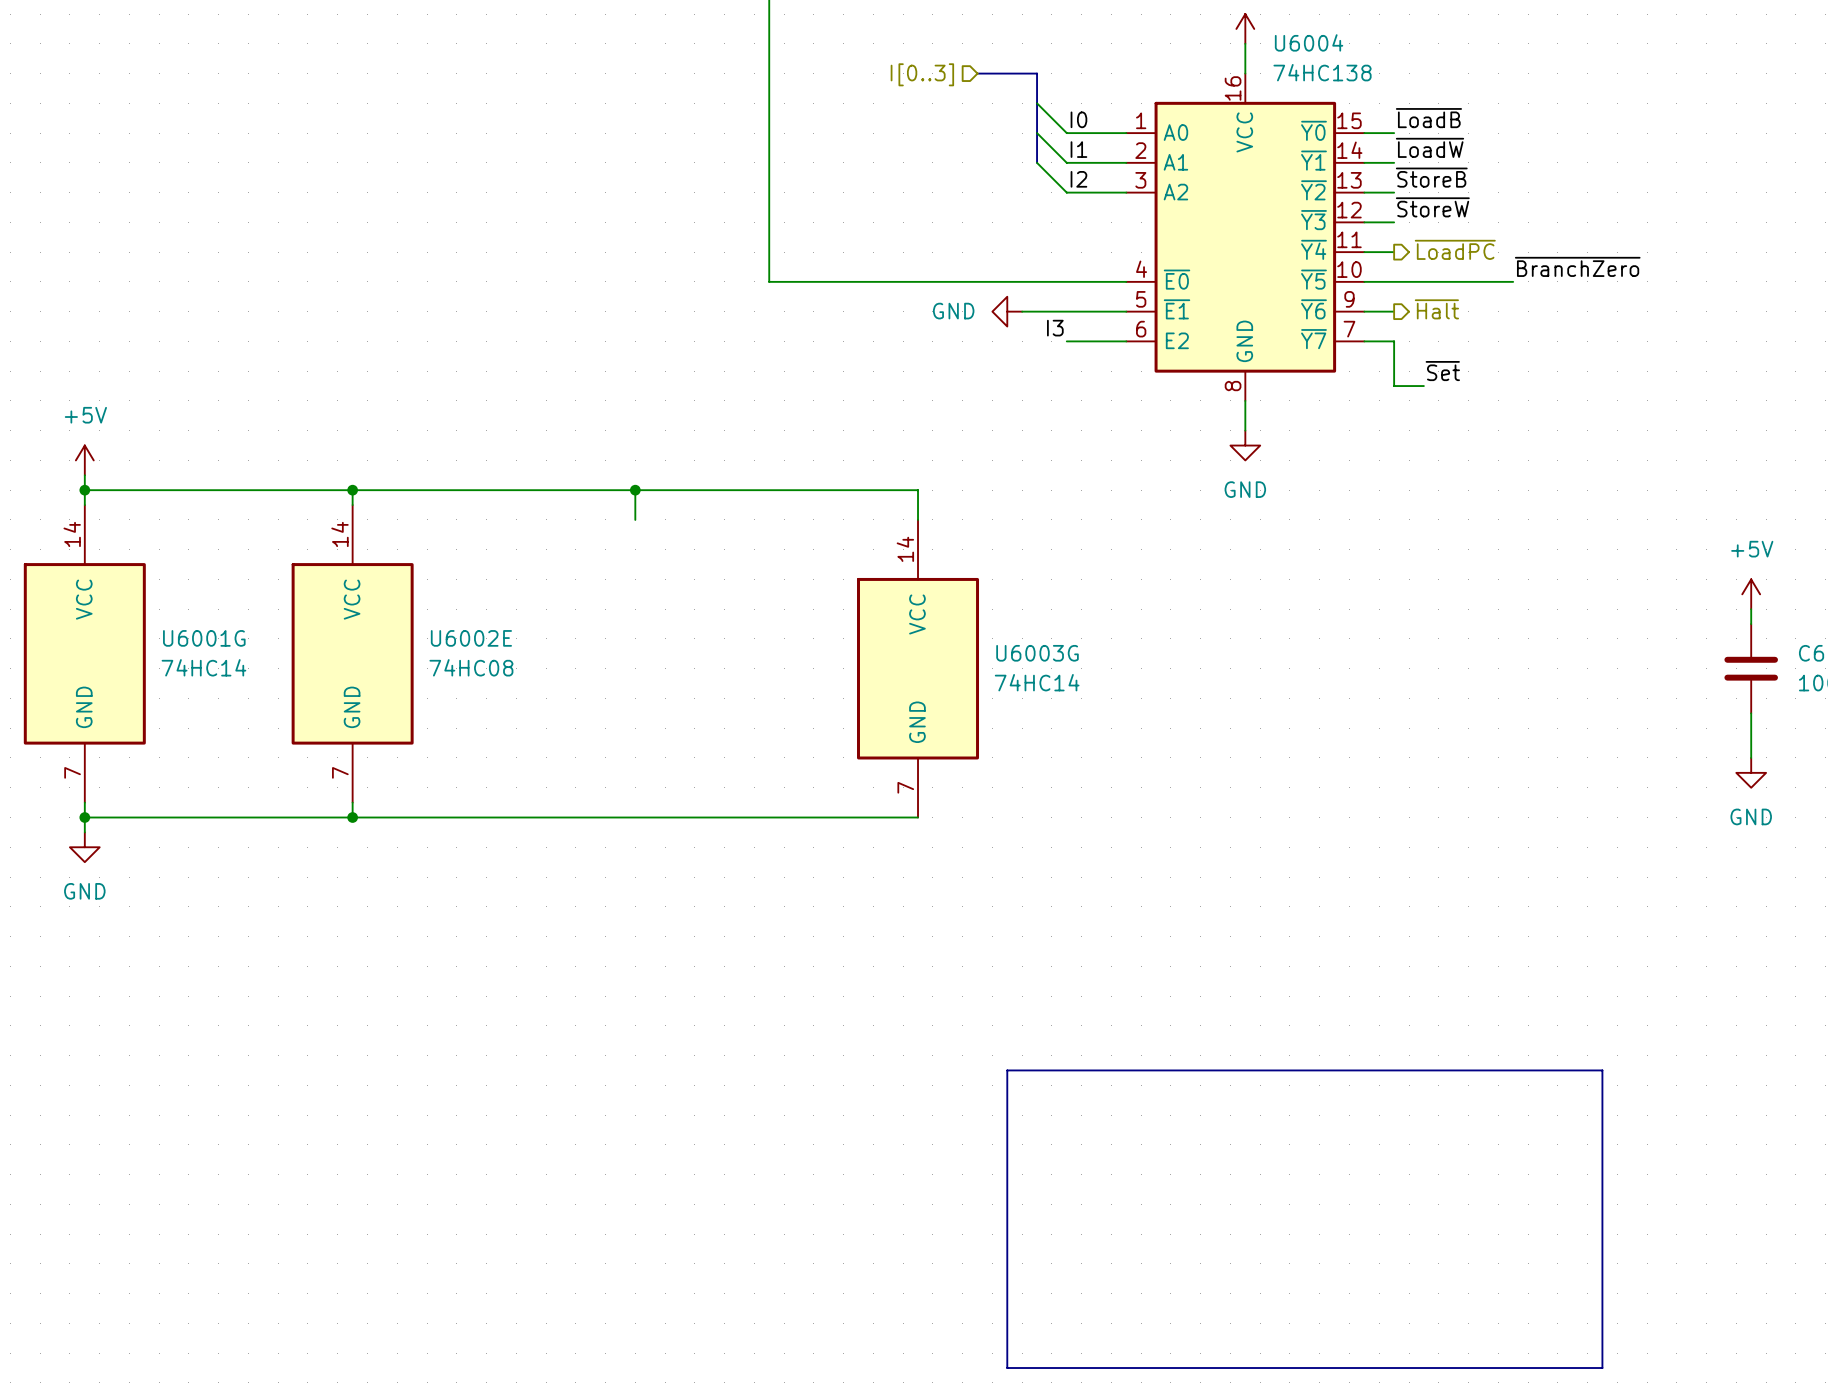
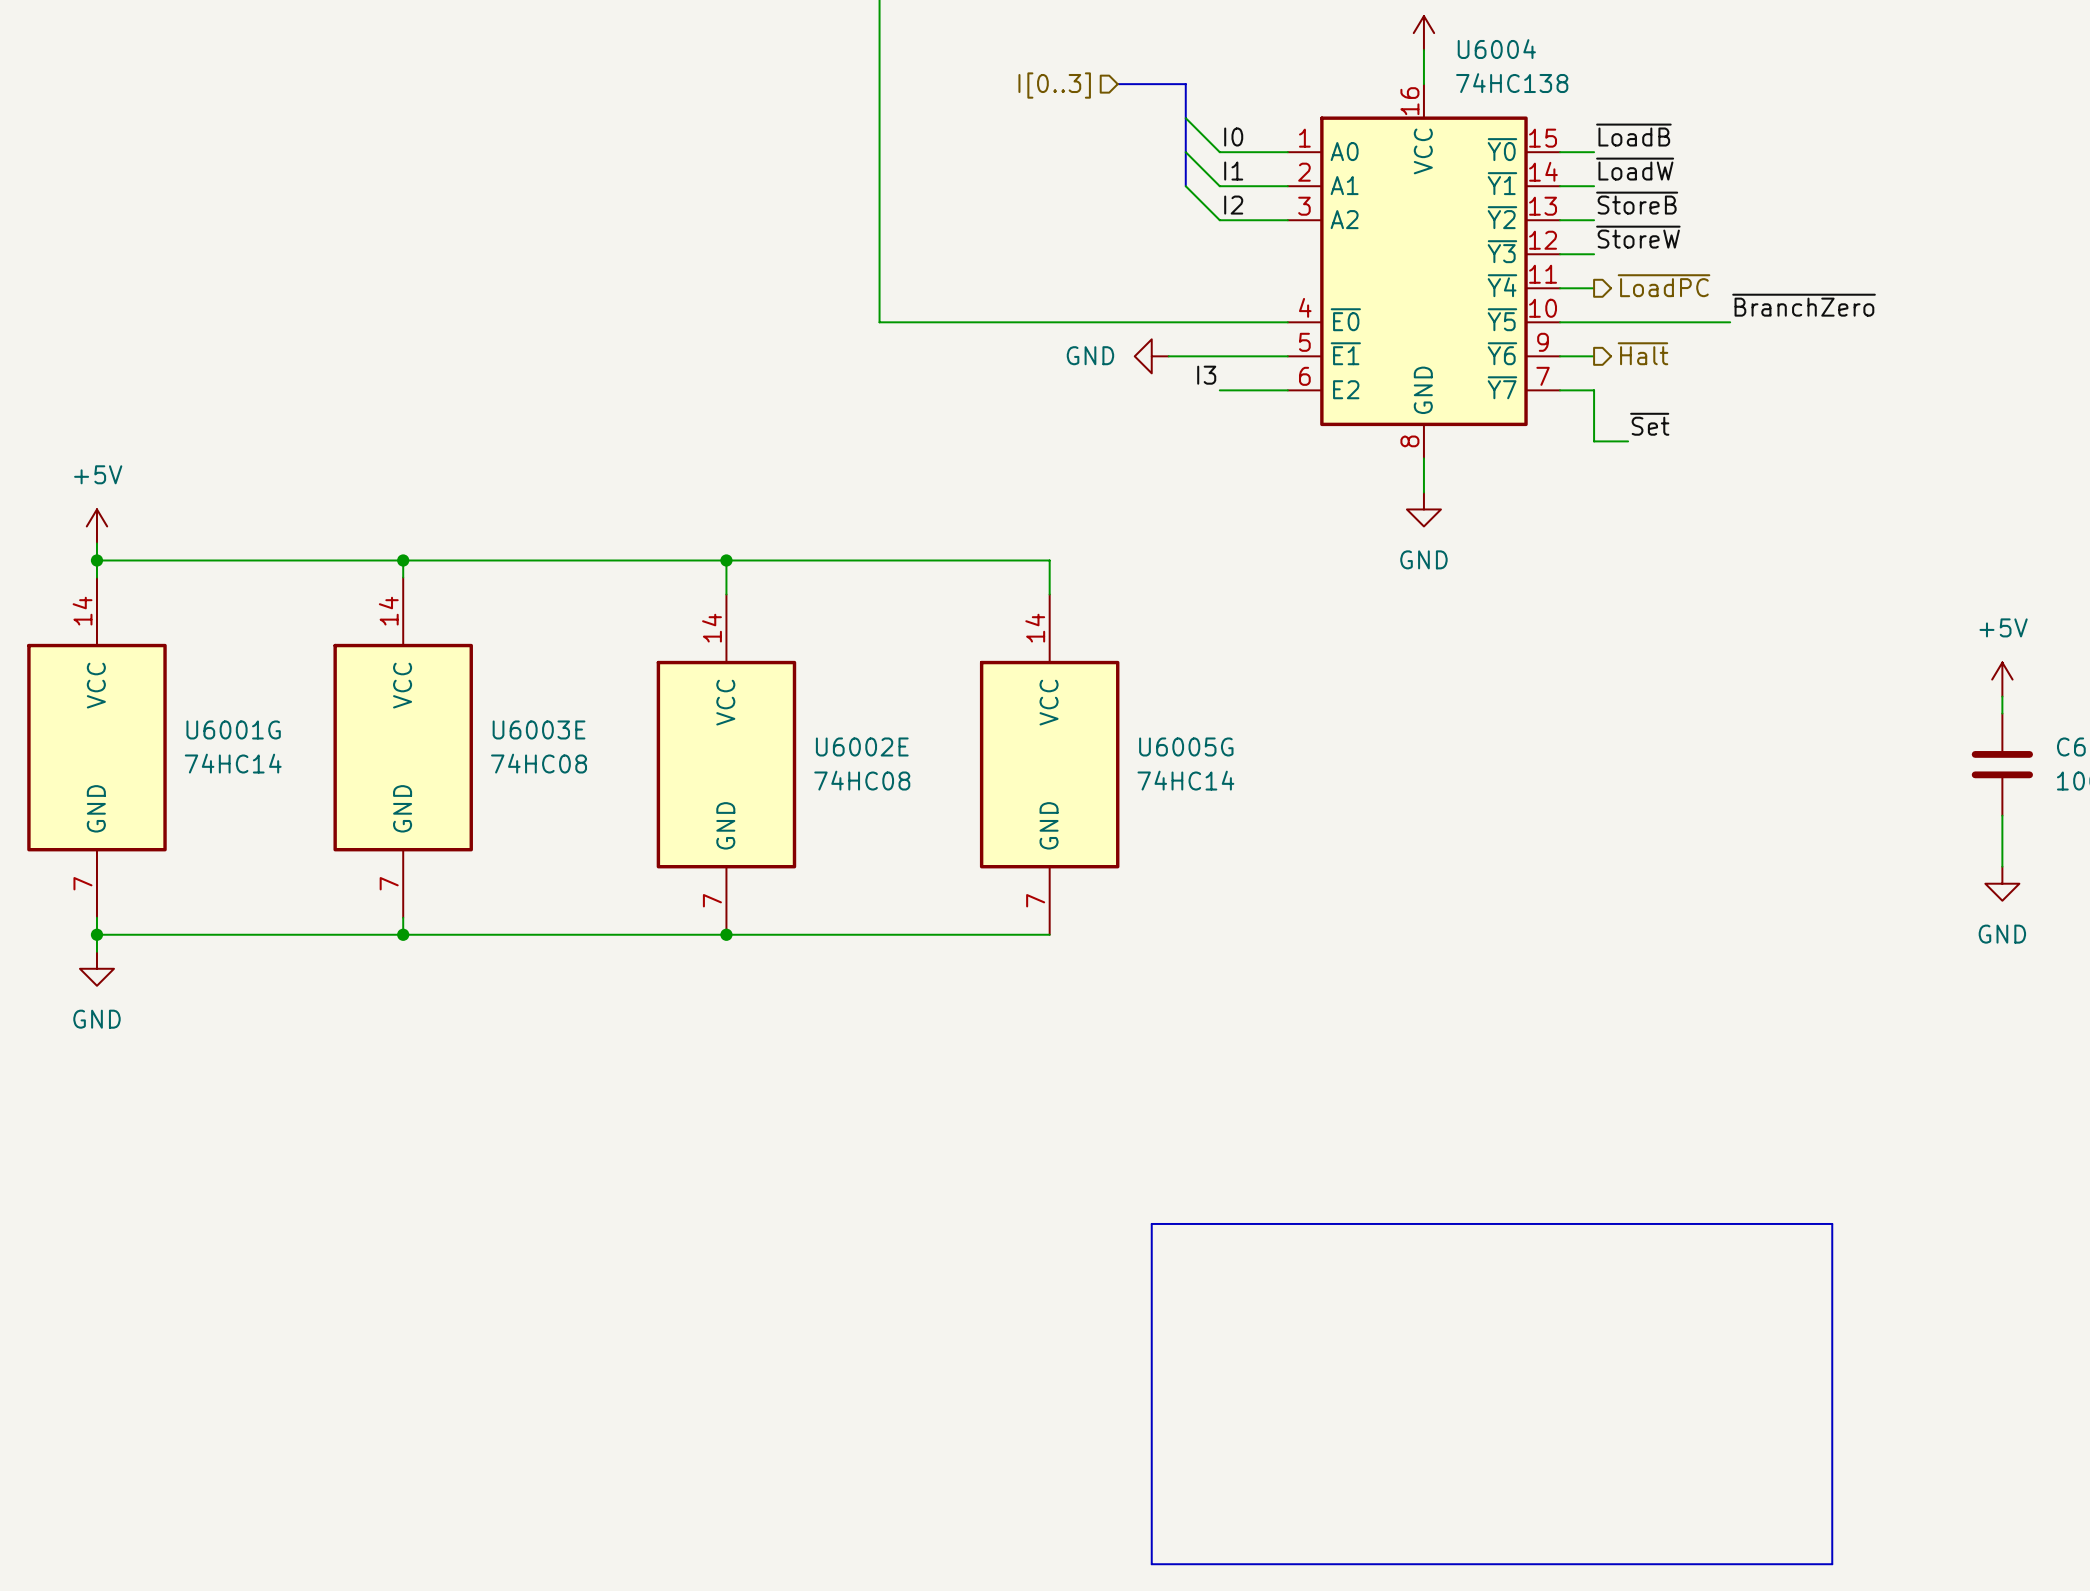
U6002E name: U6002E (471, 638) -> U6003E (539, 729)
U6003G name: U6003G (1037, 653) -> U6005G (1186, 746)
U6002E: none -> 74HC08 (726, 764)
junction: none -> (726, 934)

